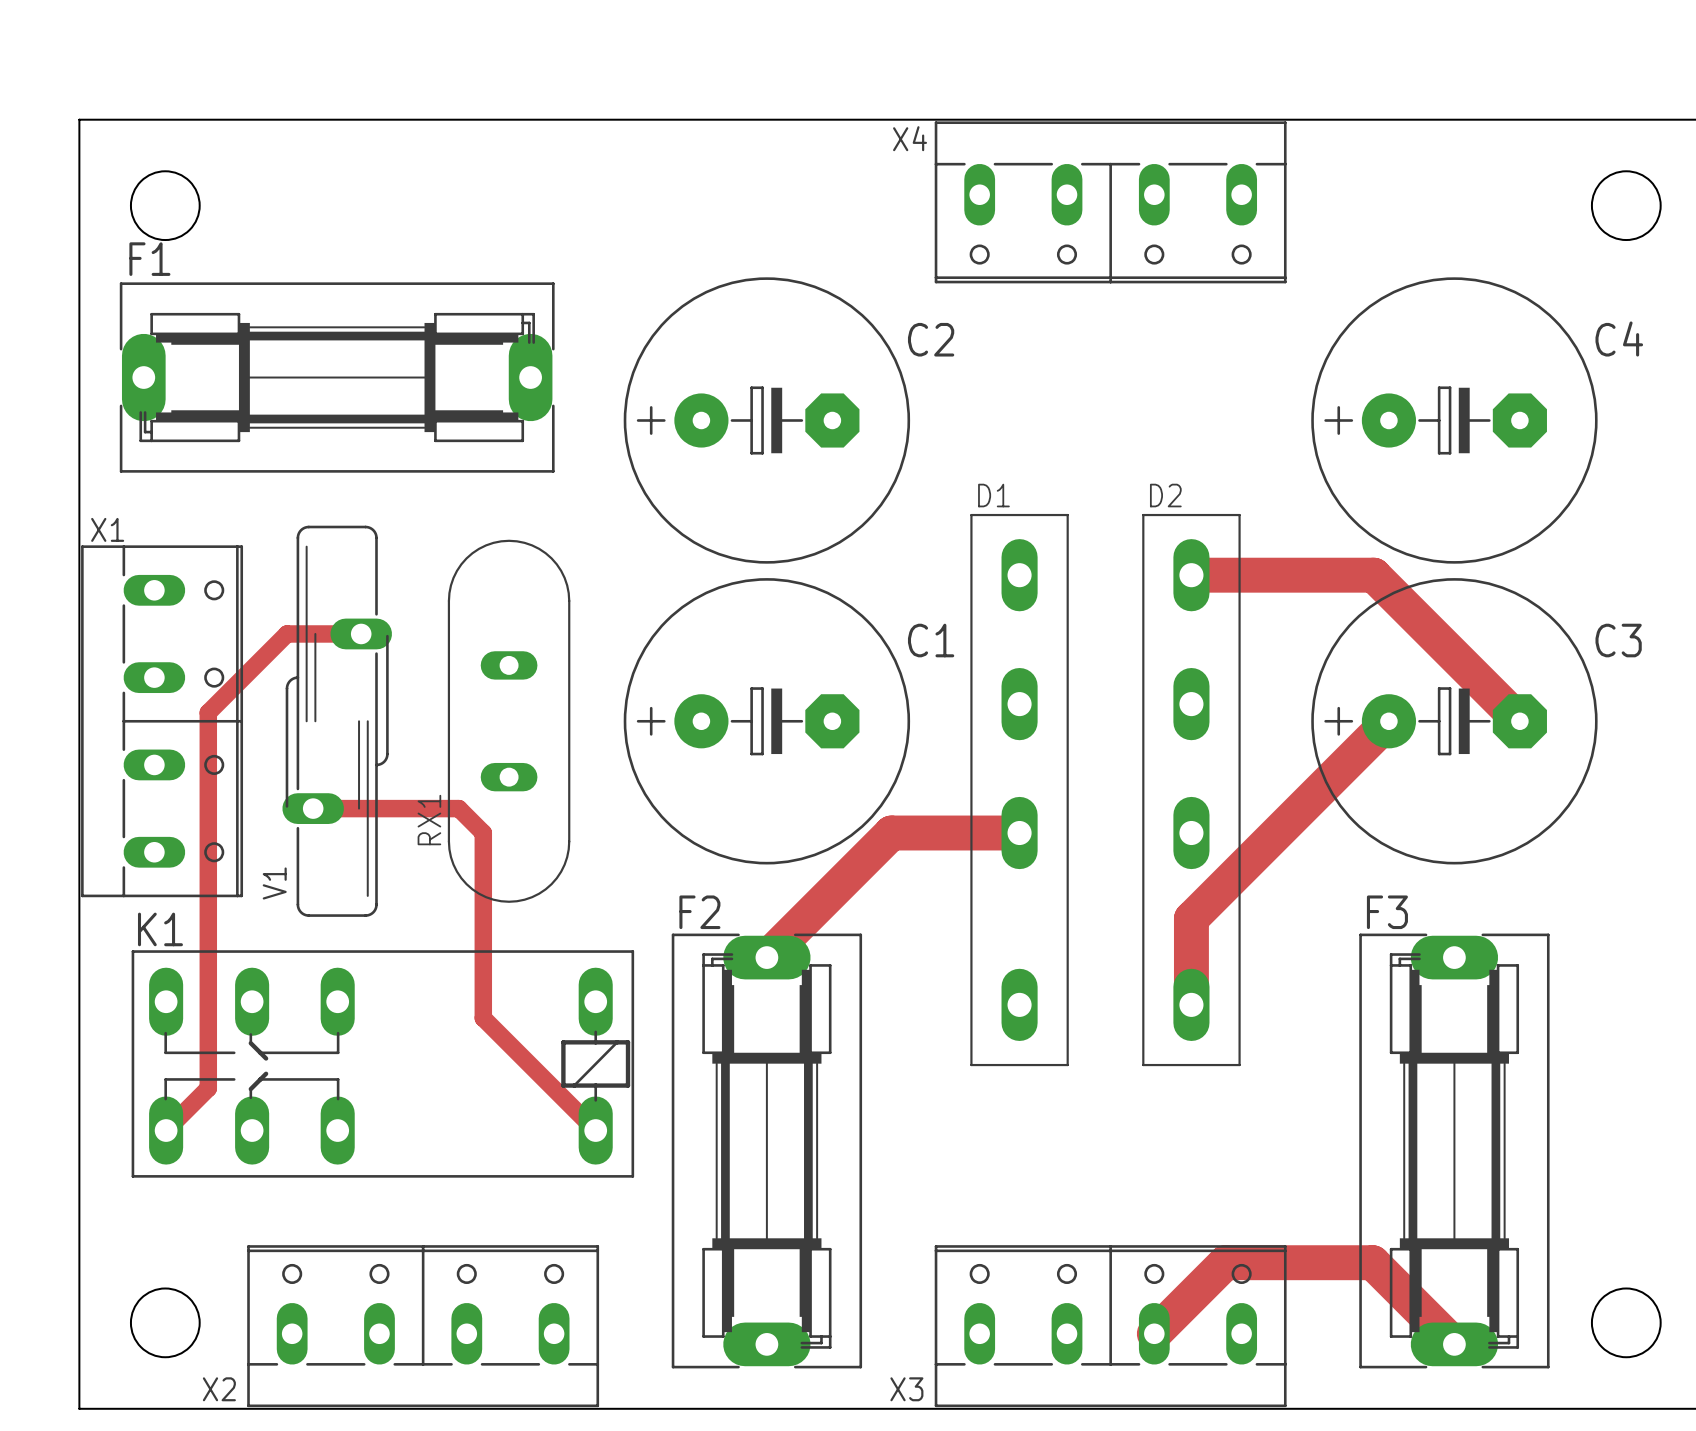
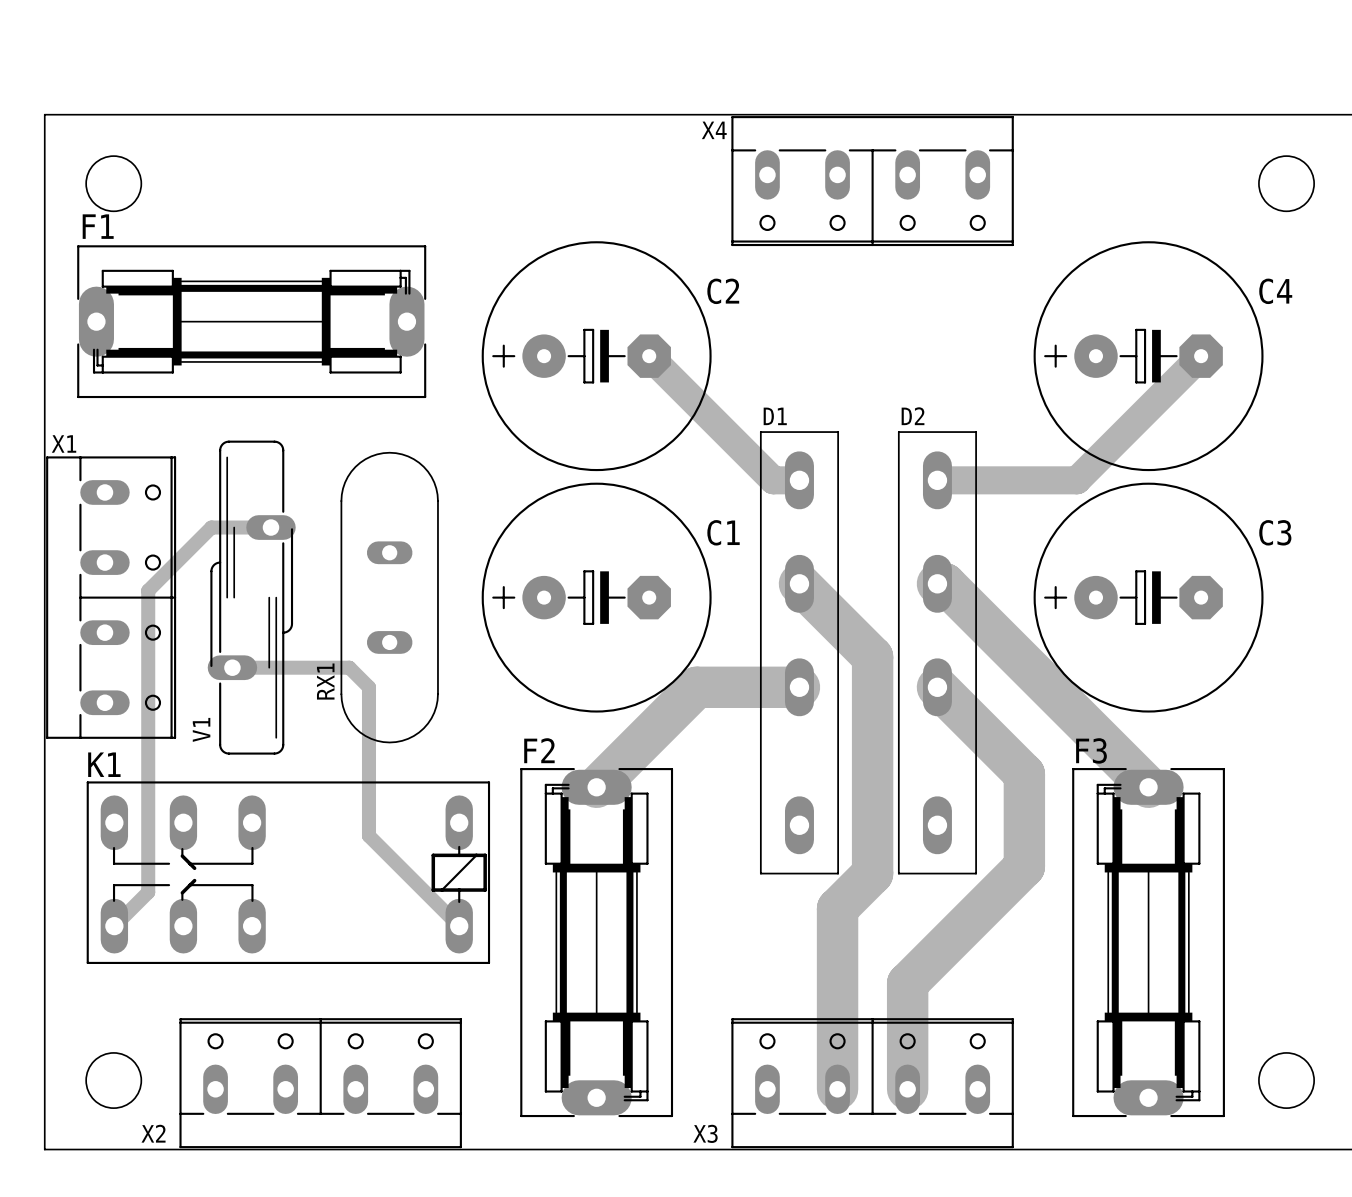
track: none -> (649, 356) (773, 480) (799, 480)
track: (1365, 575) (1373, 575) (1519, 721) -> (1076, 480) (1201, 356)
track: none -> (799, 583) (872, 656) (872, 873) (837, 908) (837, 1089)
track: none -> (937, 583) (945, 583) (1148, 787)
track: (1388, 721) (1191, 918) (1191, 1004) -> none
track width: thin (1019, 833) (891, 833) (766, 957) -> thick (799, 687) (696, 687) (596, 787)
track: (1154, 1333) (1225, 1262) (1372, 1262) (1454, 1344) -> (907, 1089) (907, 983) (1024, 866) (1024, 774) (937, 687)

